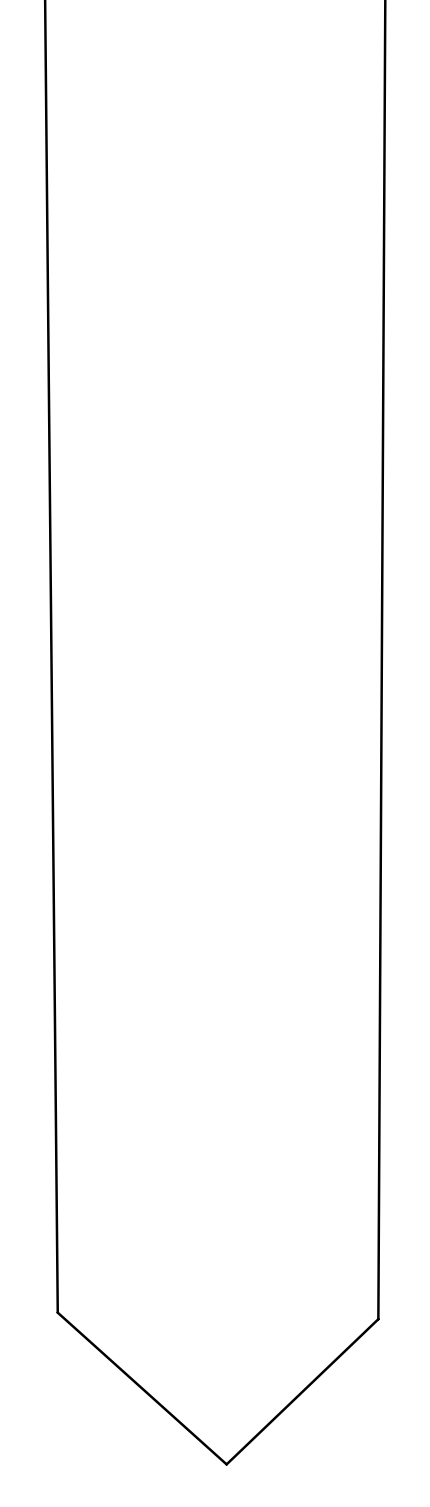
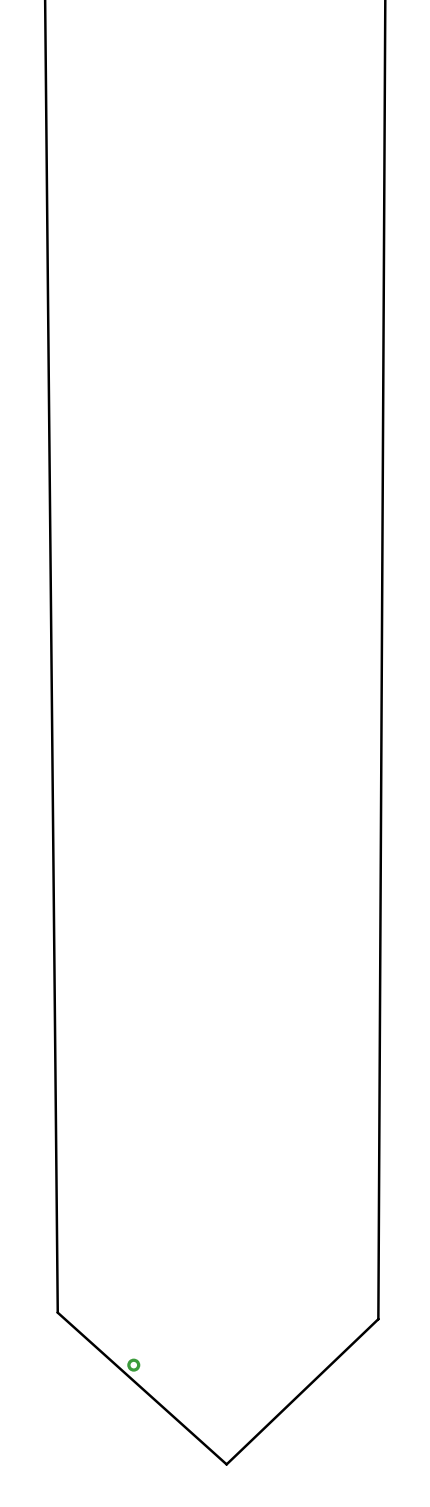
via: none -> (133, 1365)

